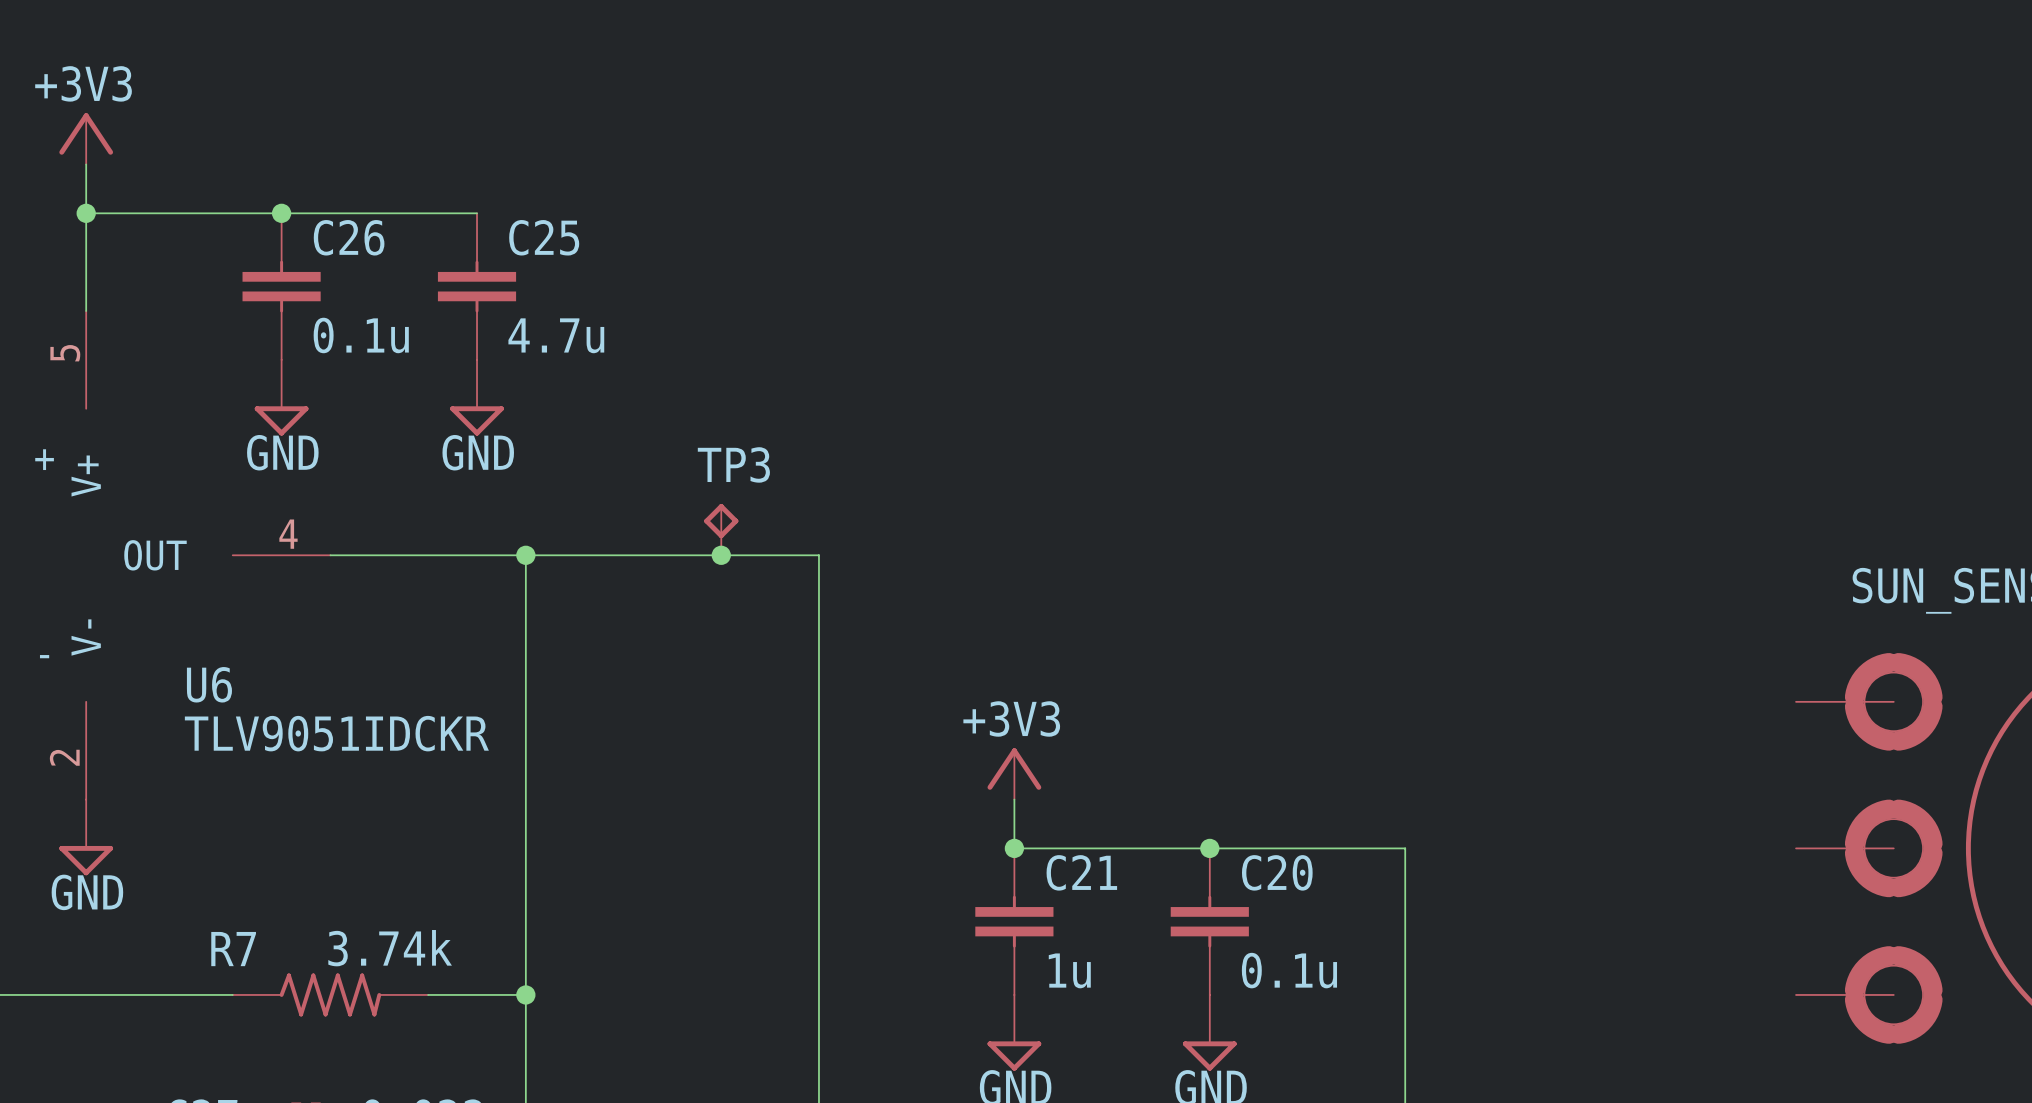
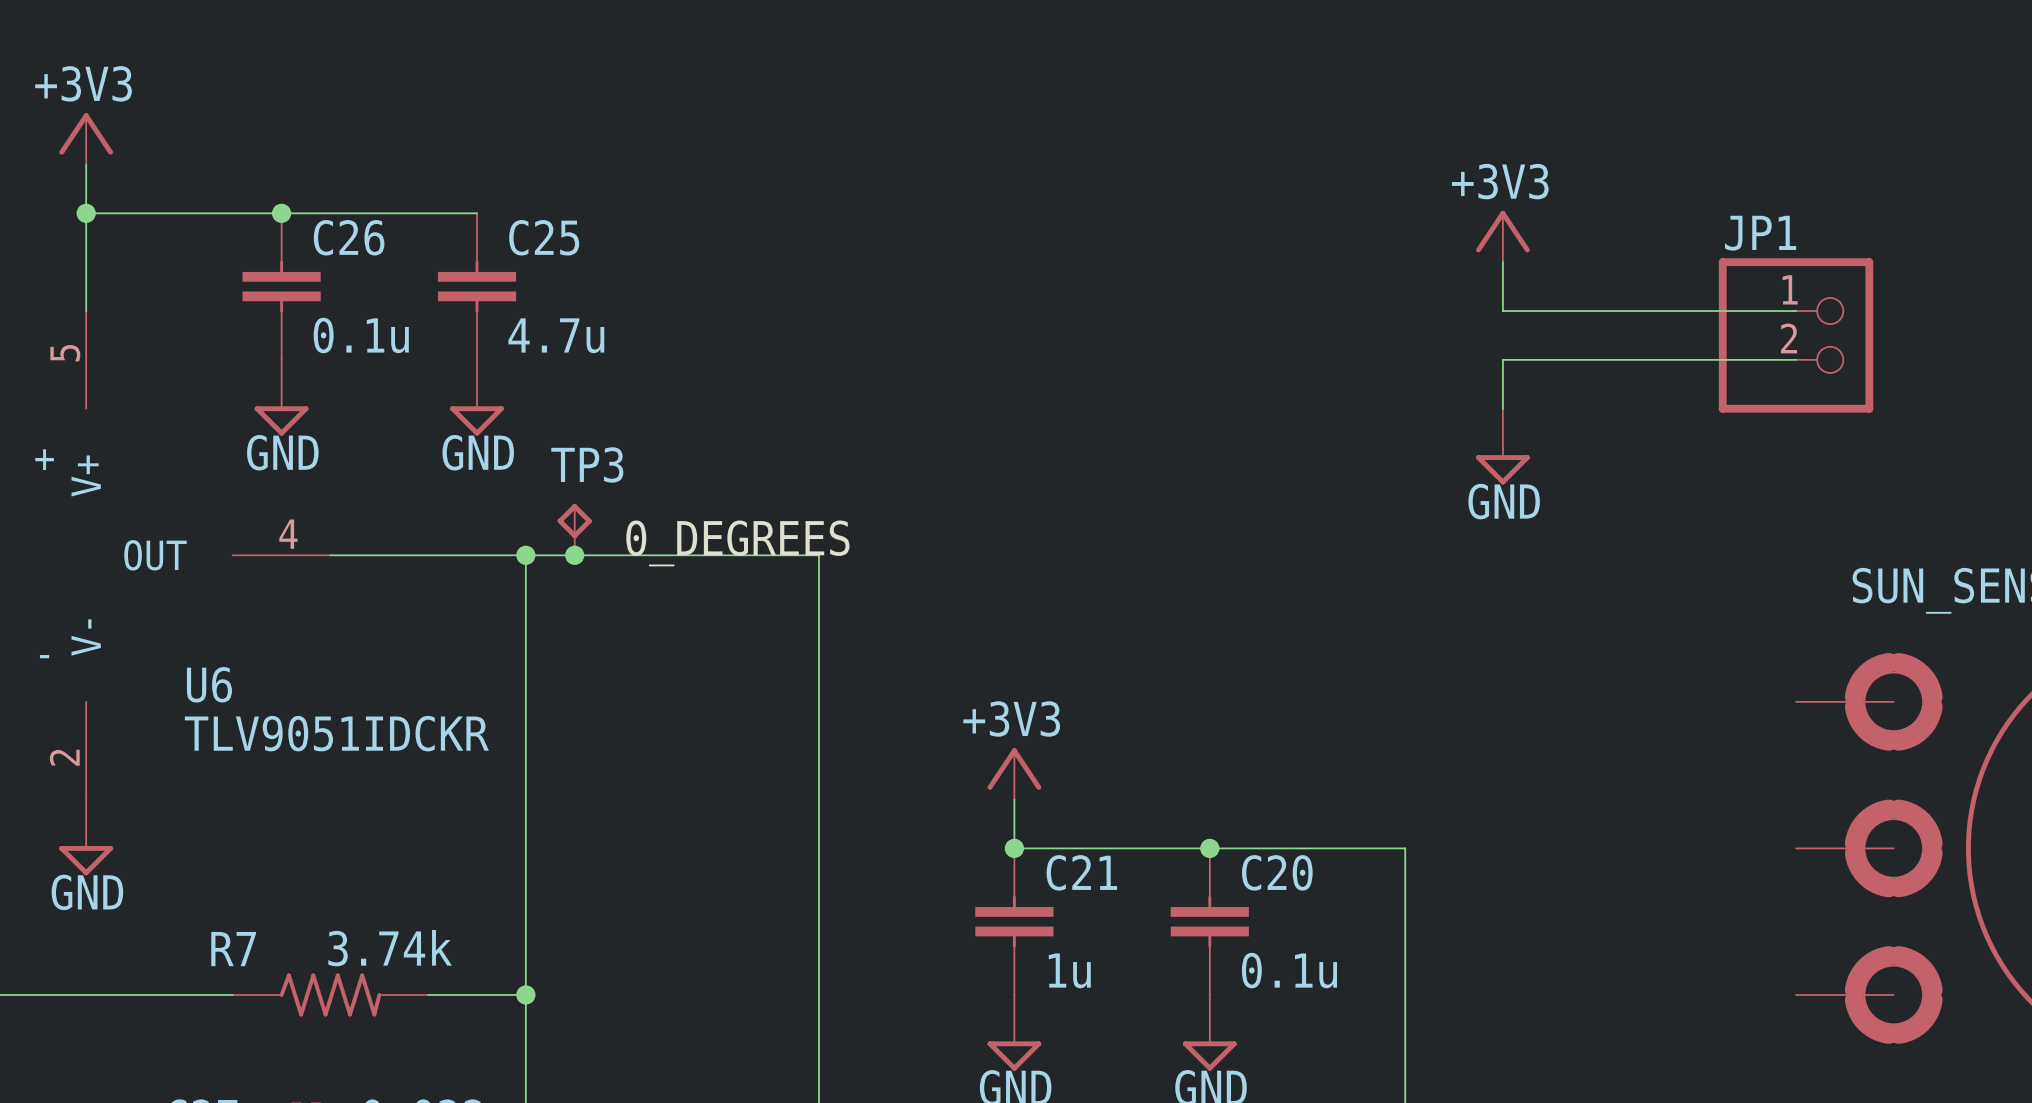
power symbol: none -> +3V3 (1502, 236)
wire: none -> (1502, 262) (1502, 311) (1796, 311)
JP1: none -> (1796, 335)
wire: none -> (1796, 359) (1502, 359) (1502, 408)
power symbol: none -> GND (1502, 446)
TP3 position: (721, 529) -> (574, 529)
label: none -> 0_DEGREES (737, 543)
junction: none -> (574, 555)
junction: (721, 555) -> none

